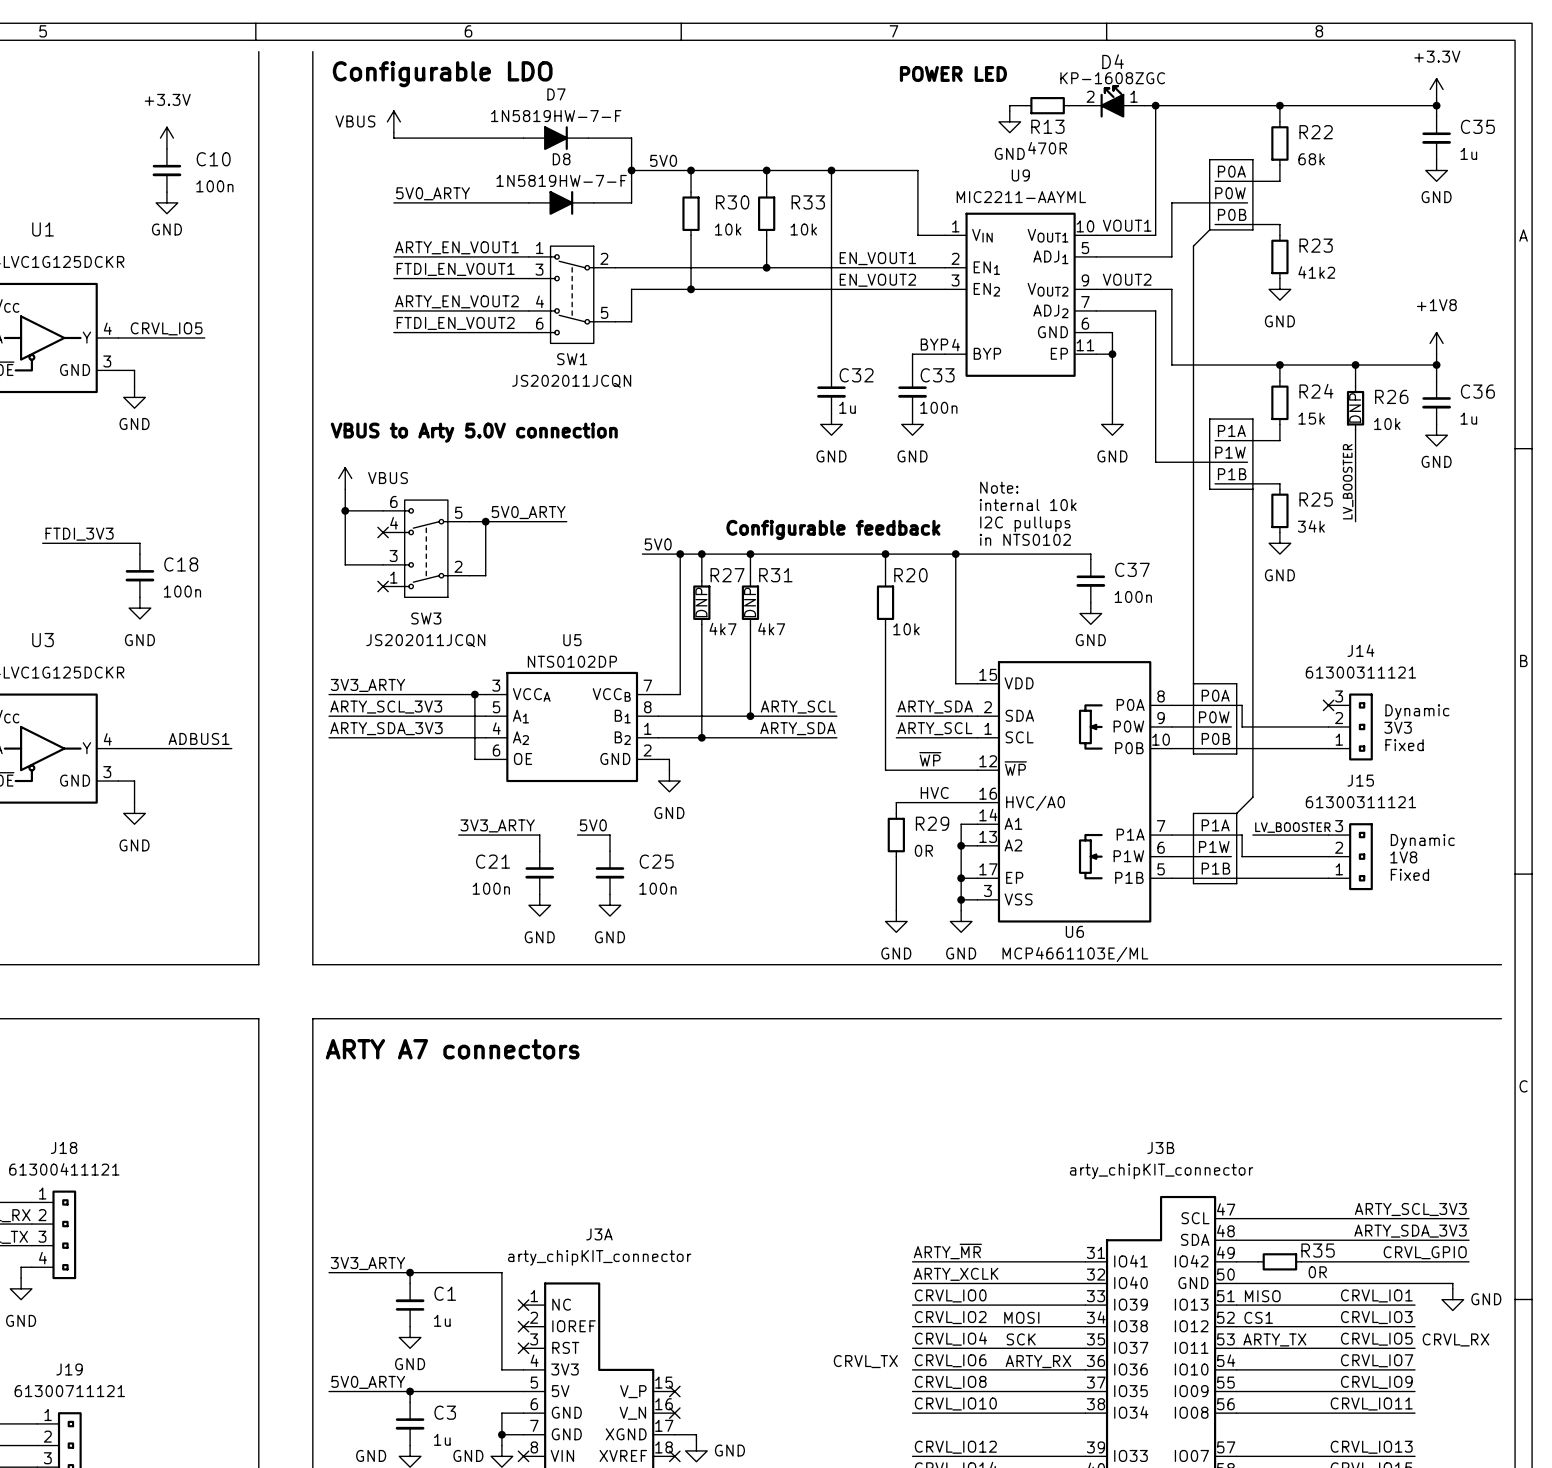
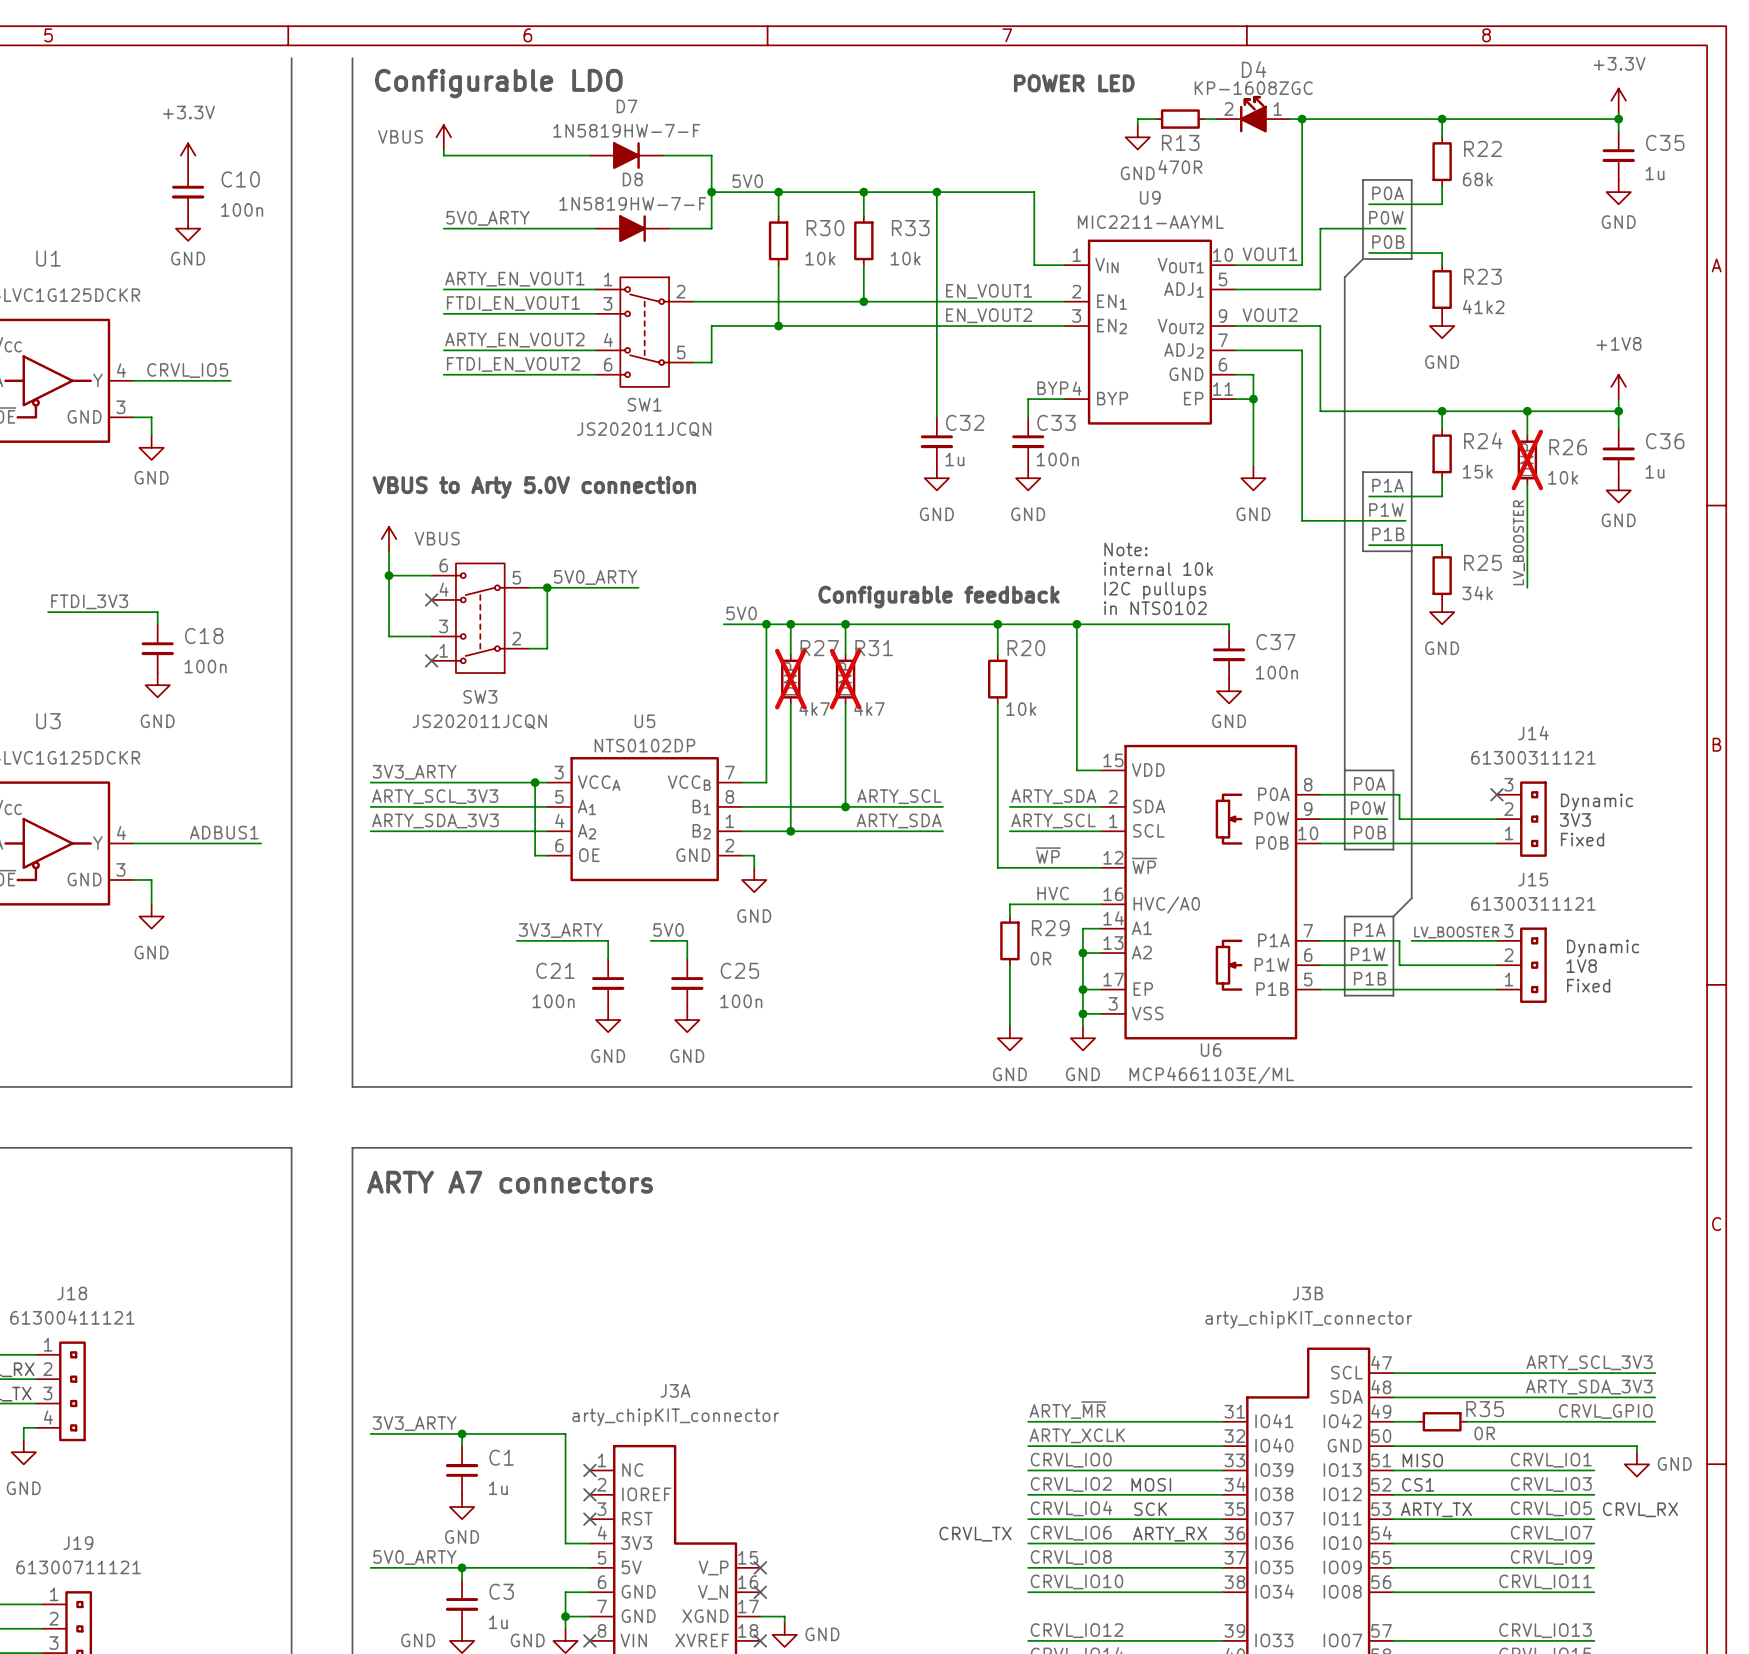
R26 do-not-place cross: none -> (1527, 459)
R27 do-not-place cross: none -> (790, 679)
R31 do-not-place cross: none -> (845, 679)

